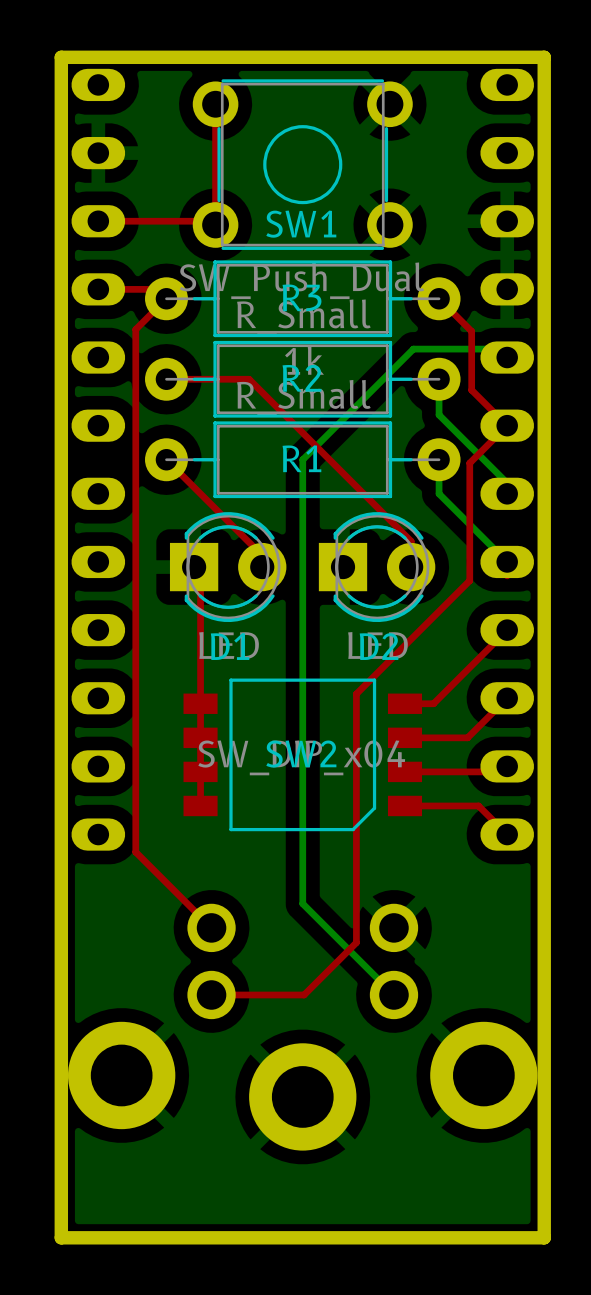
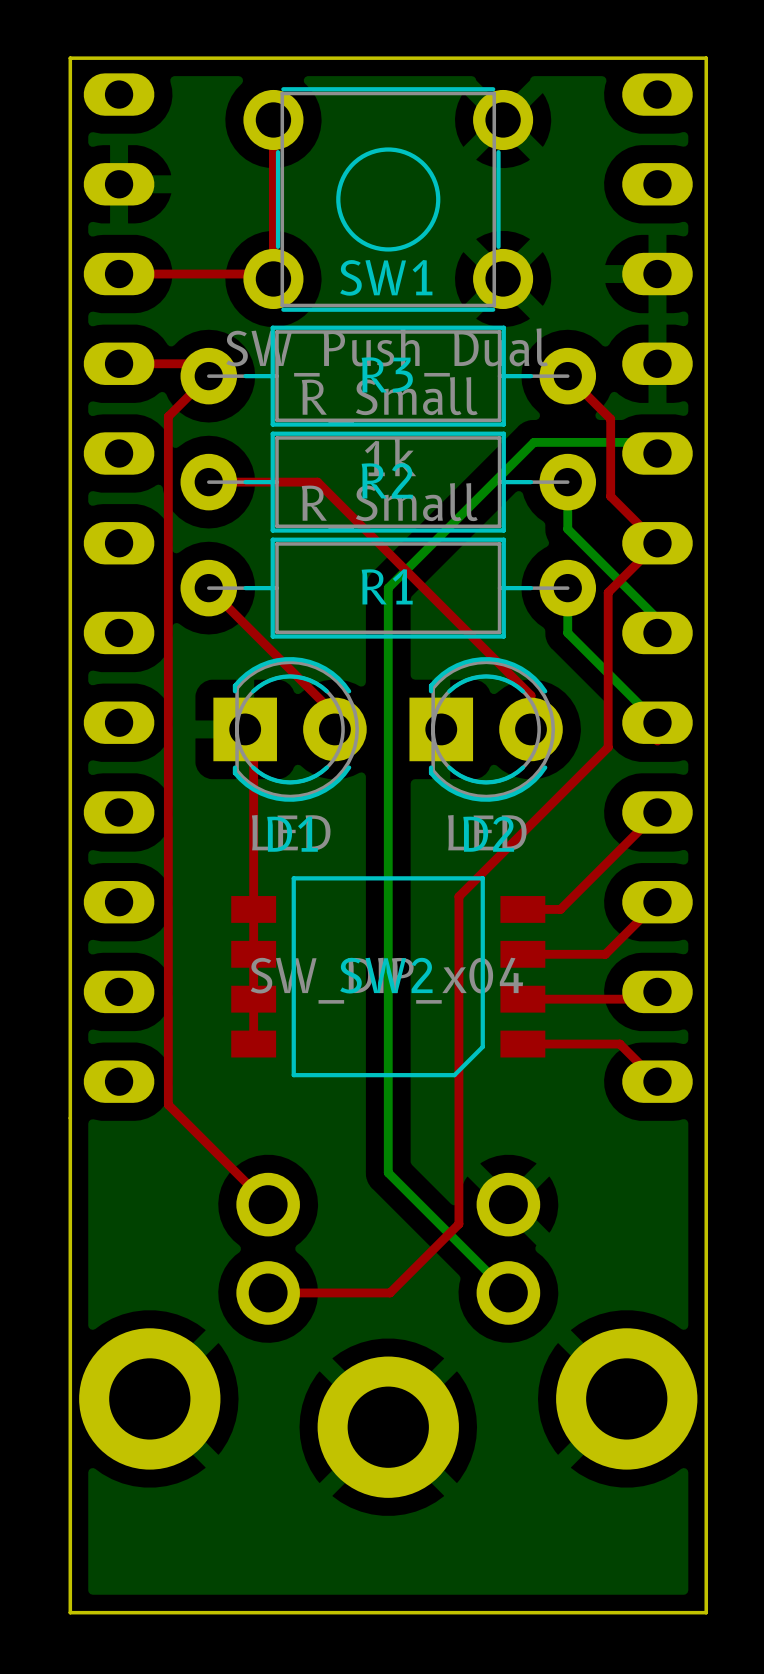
board edge width: thick (61, 57) (61, 1237) (544, 1237) (544, 57) (61, 57) -> thin (70, 58) (70, 1612) (706, 1612) (706, 58) (70, 58)

